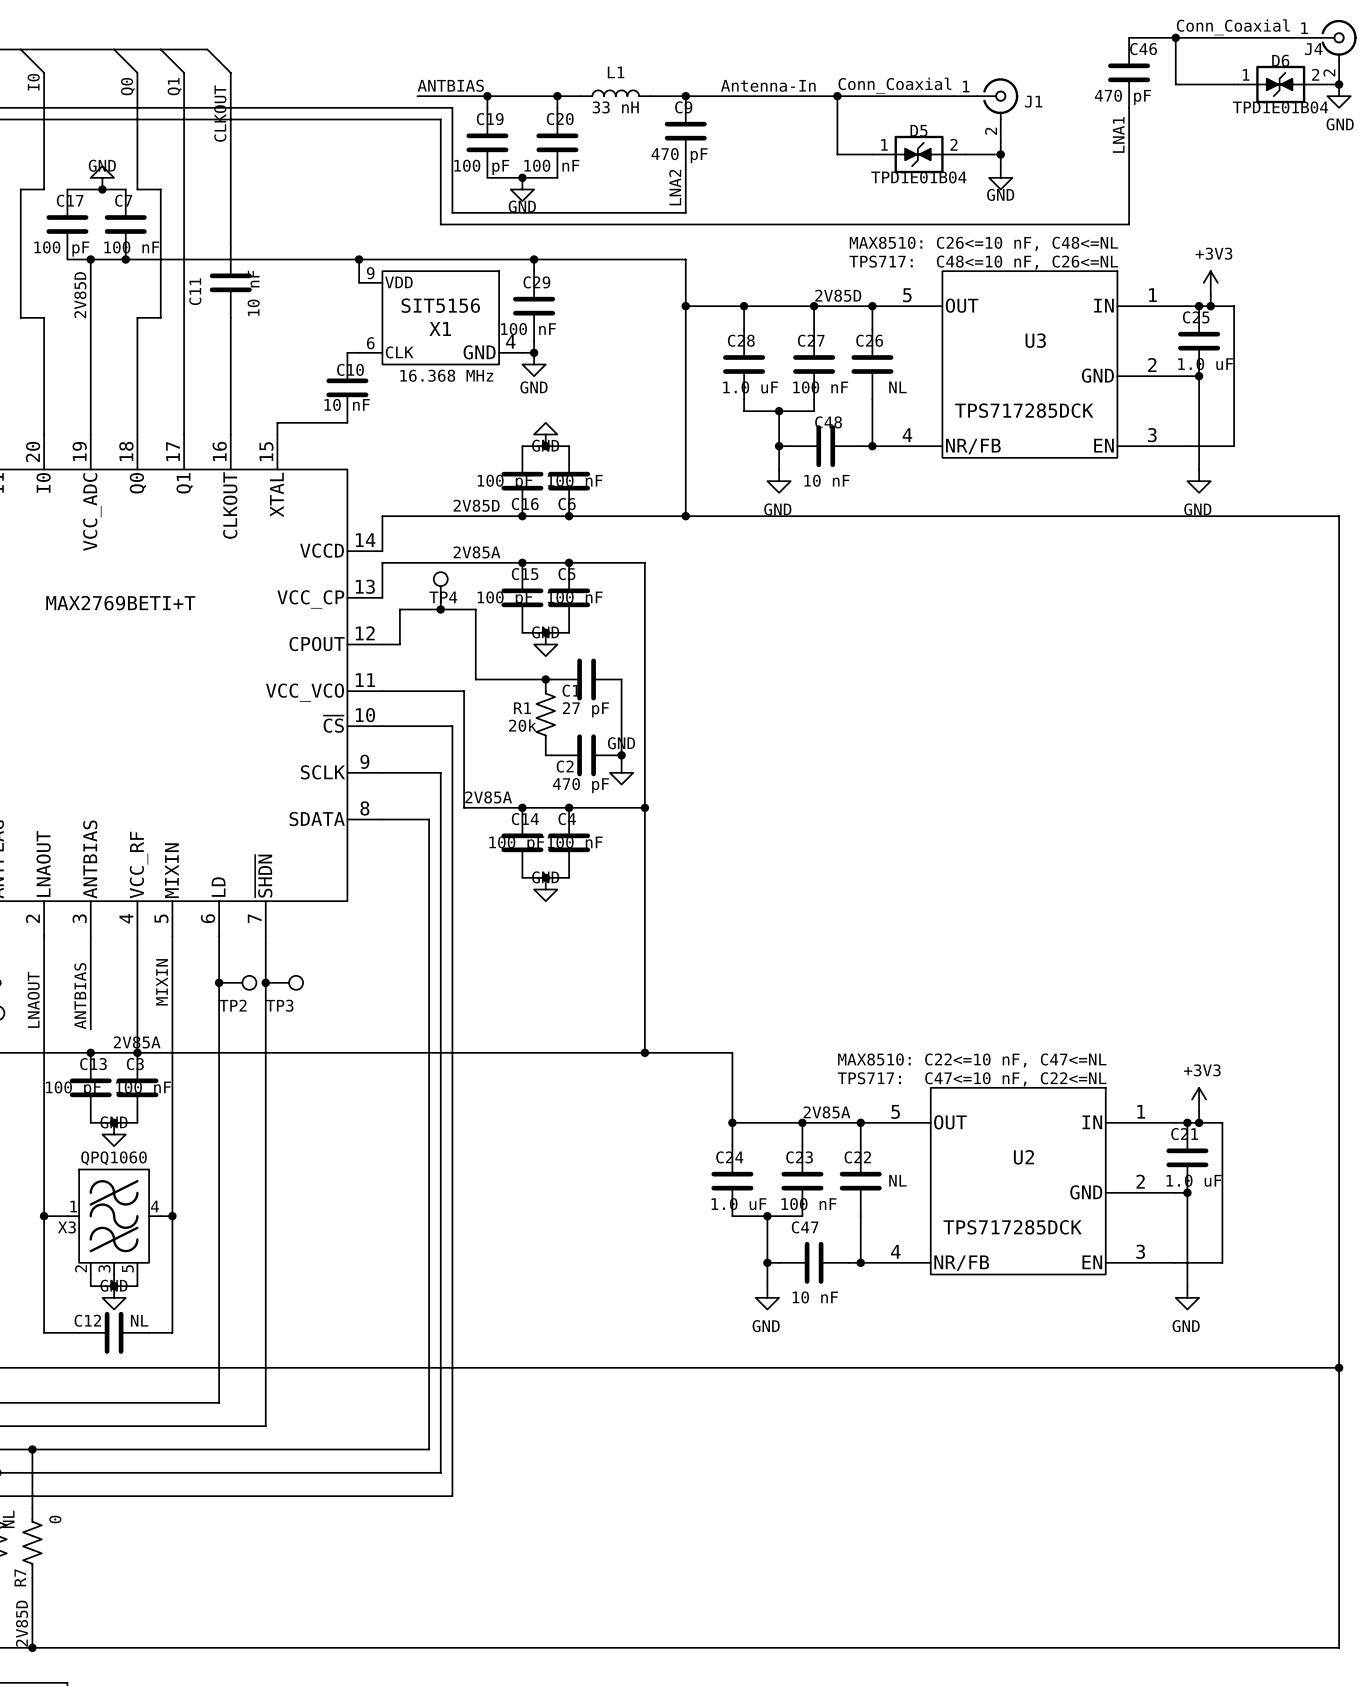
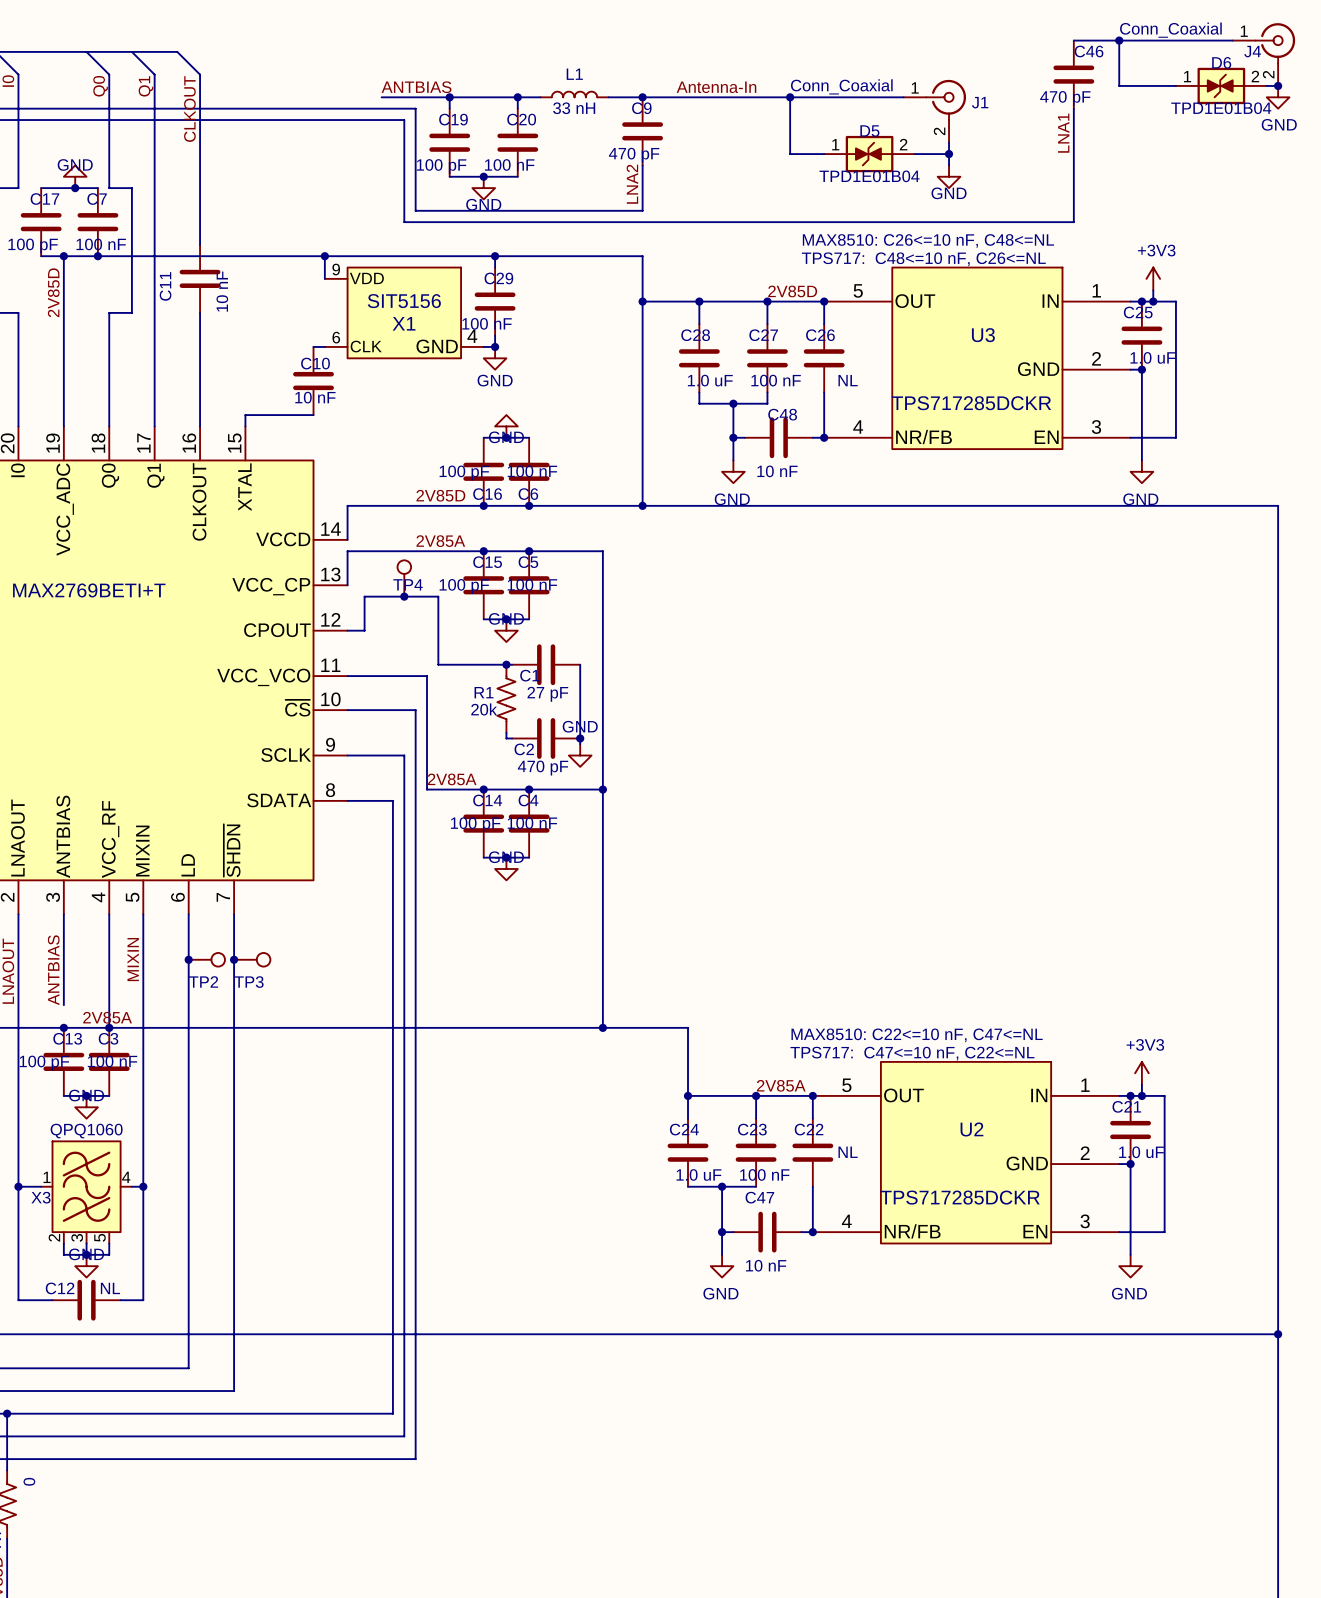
X1 text: 16.368 MHz (446, 375) -> none
U3 value: TPS717285DCK (1024, 410) -> TPS717285DCKR (971, 403)
U2 value: TPS717285DCK (1012, 1227) -> TPS717285DCKR (960, 1197)

